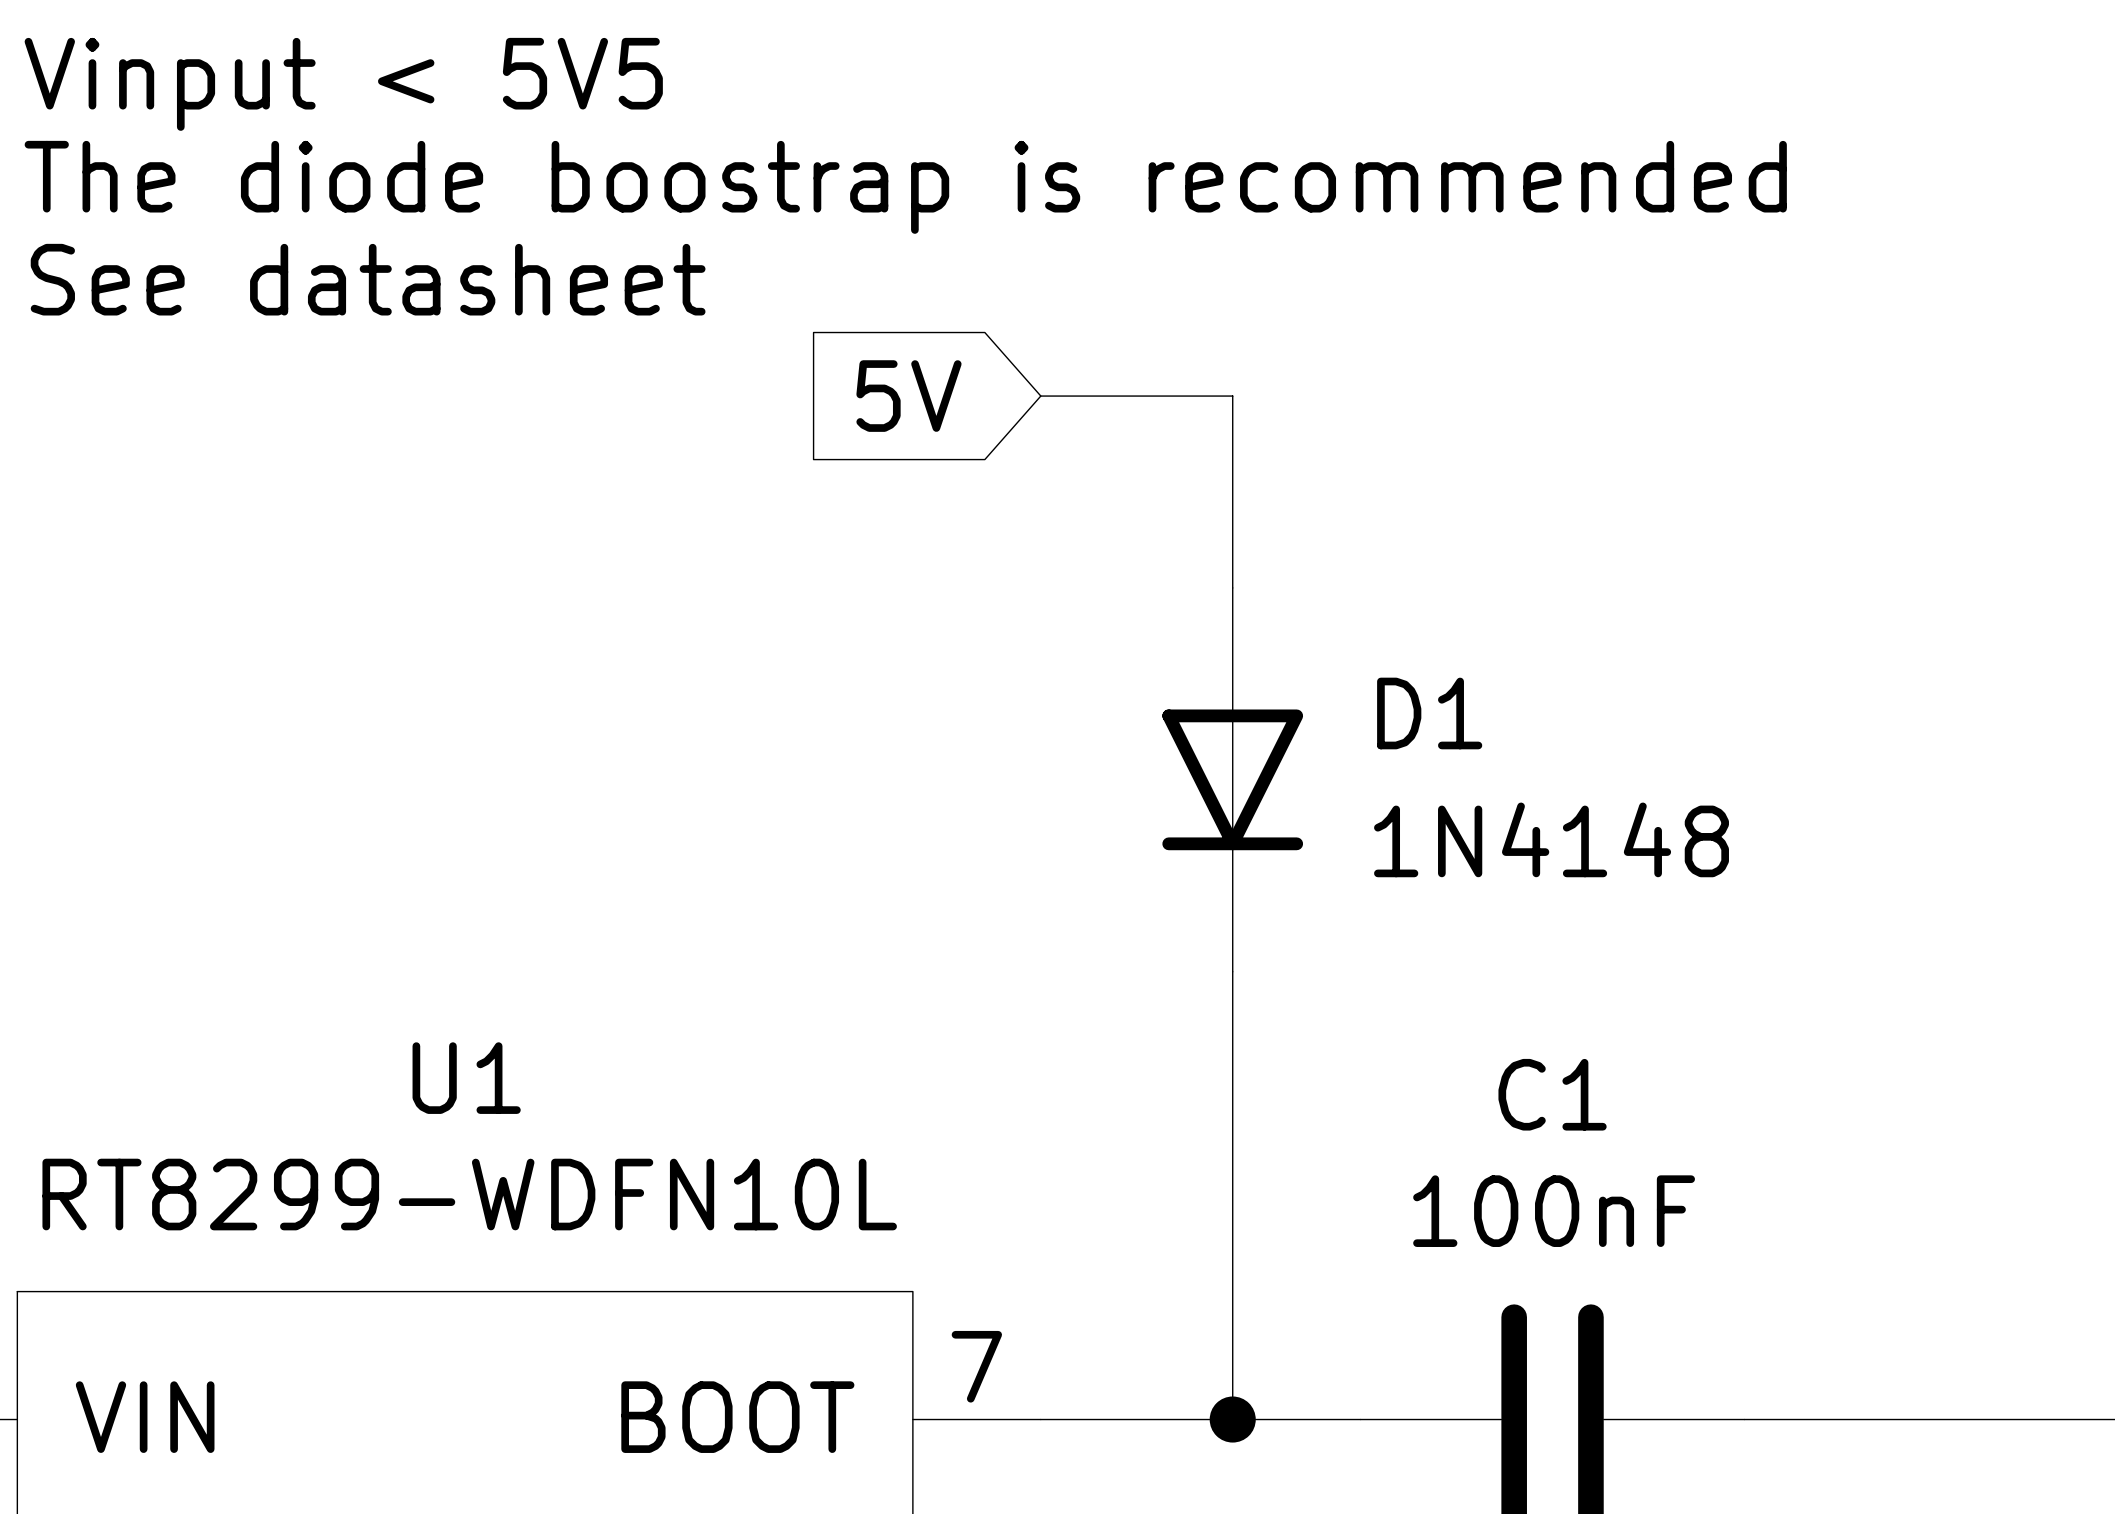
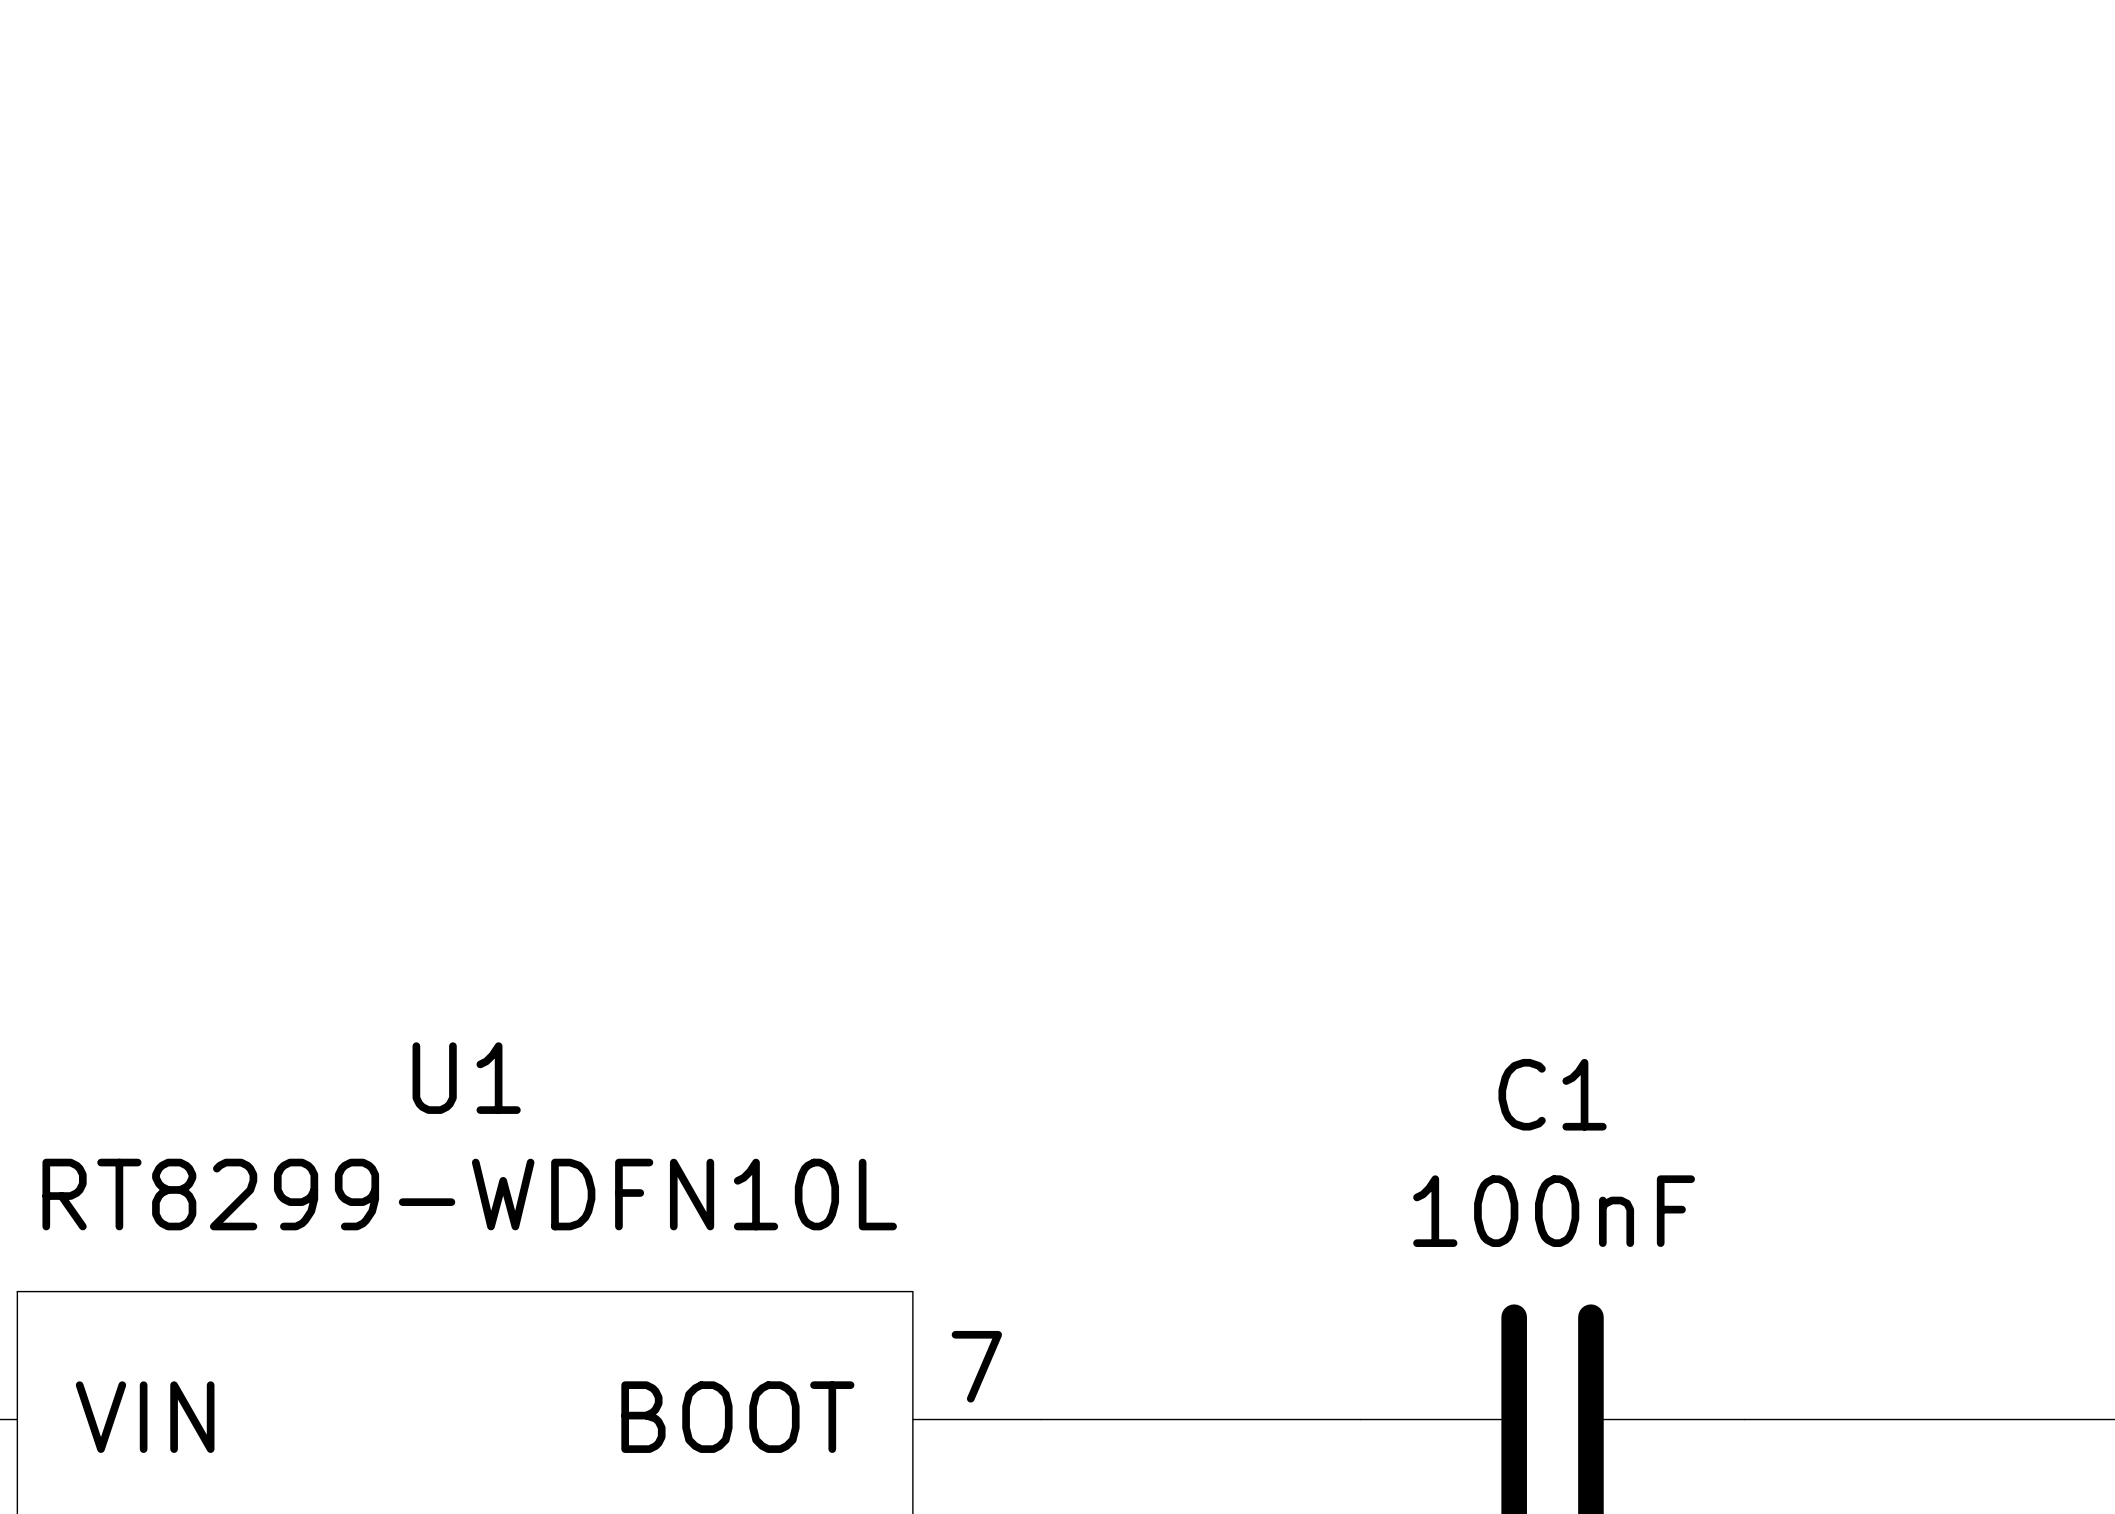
text: Vinput < 5V5 (343, 84) -> none
text: The diode boostrap is recommended (905, 187) -> none
text: See datasheet (368, 279) -> none
global label: 5V (908, 396) -> none
wire: (1040, 396) (1232, 396) (1232, 587) -> none
D1: 1N4148 (1232, 779) -> none
wire: (1232, 971) (1232, 1419) -> none
junction: (1232, 1419) -> none

